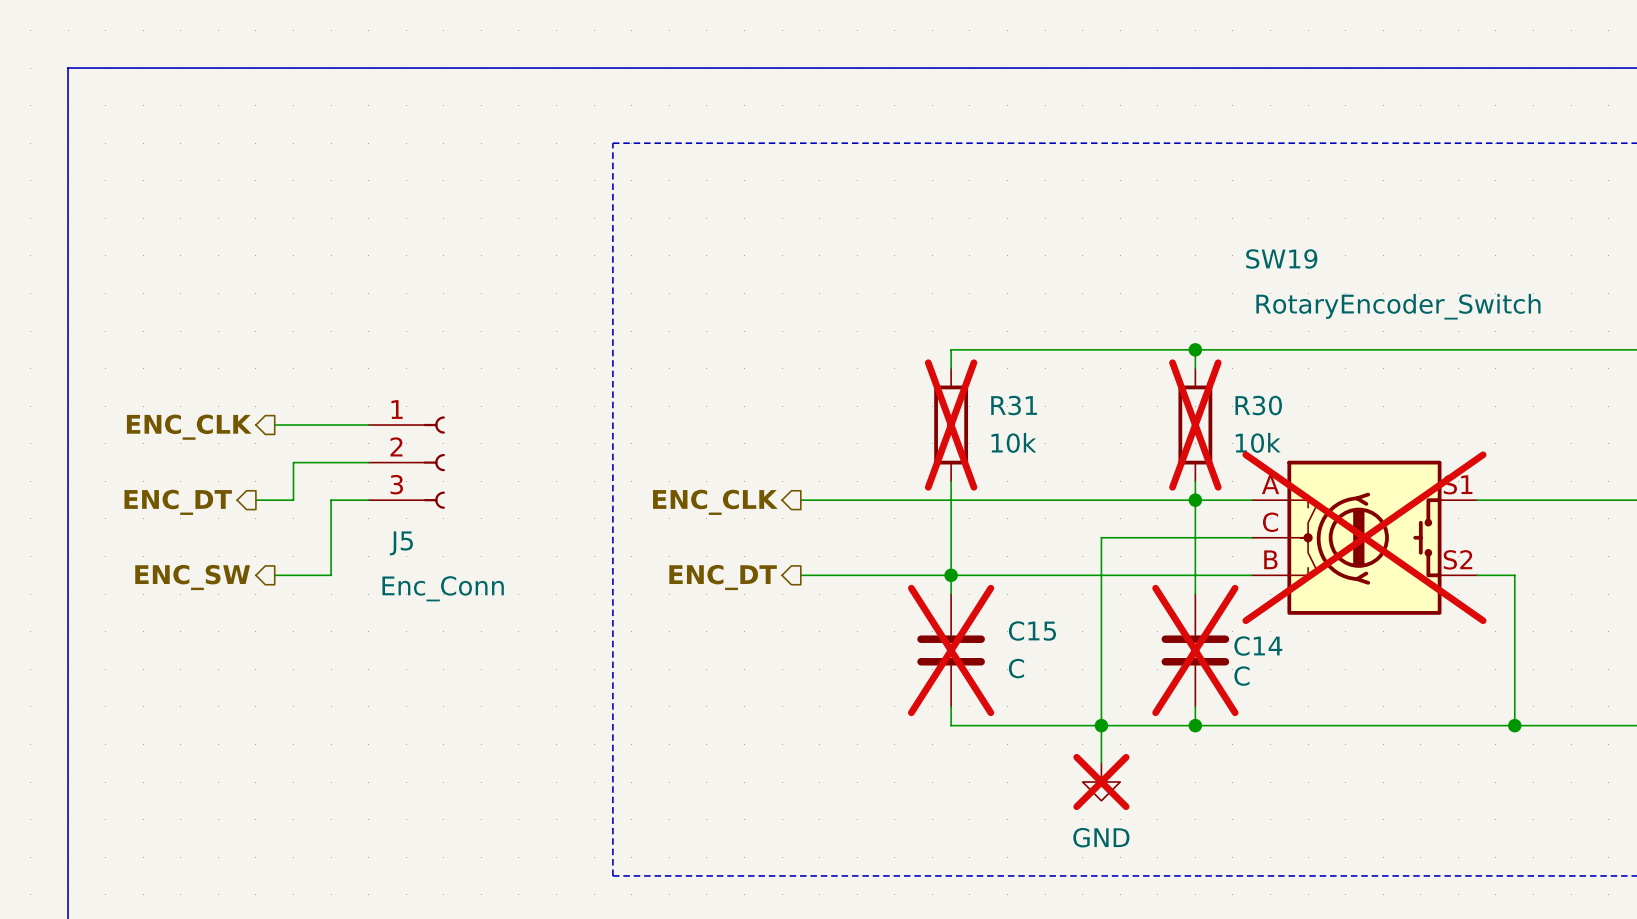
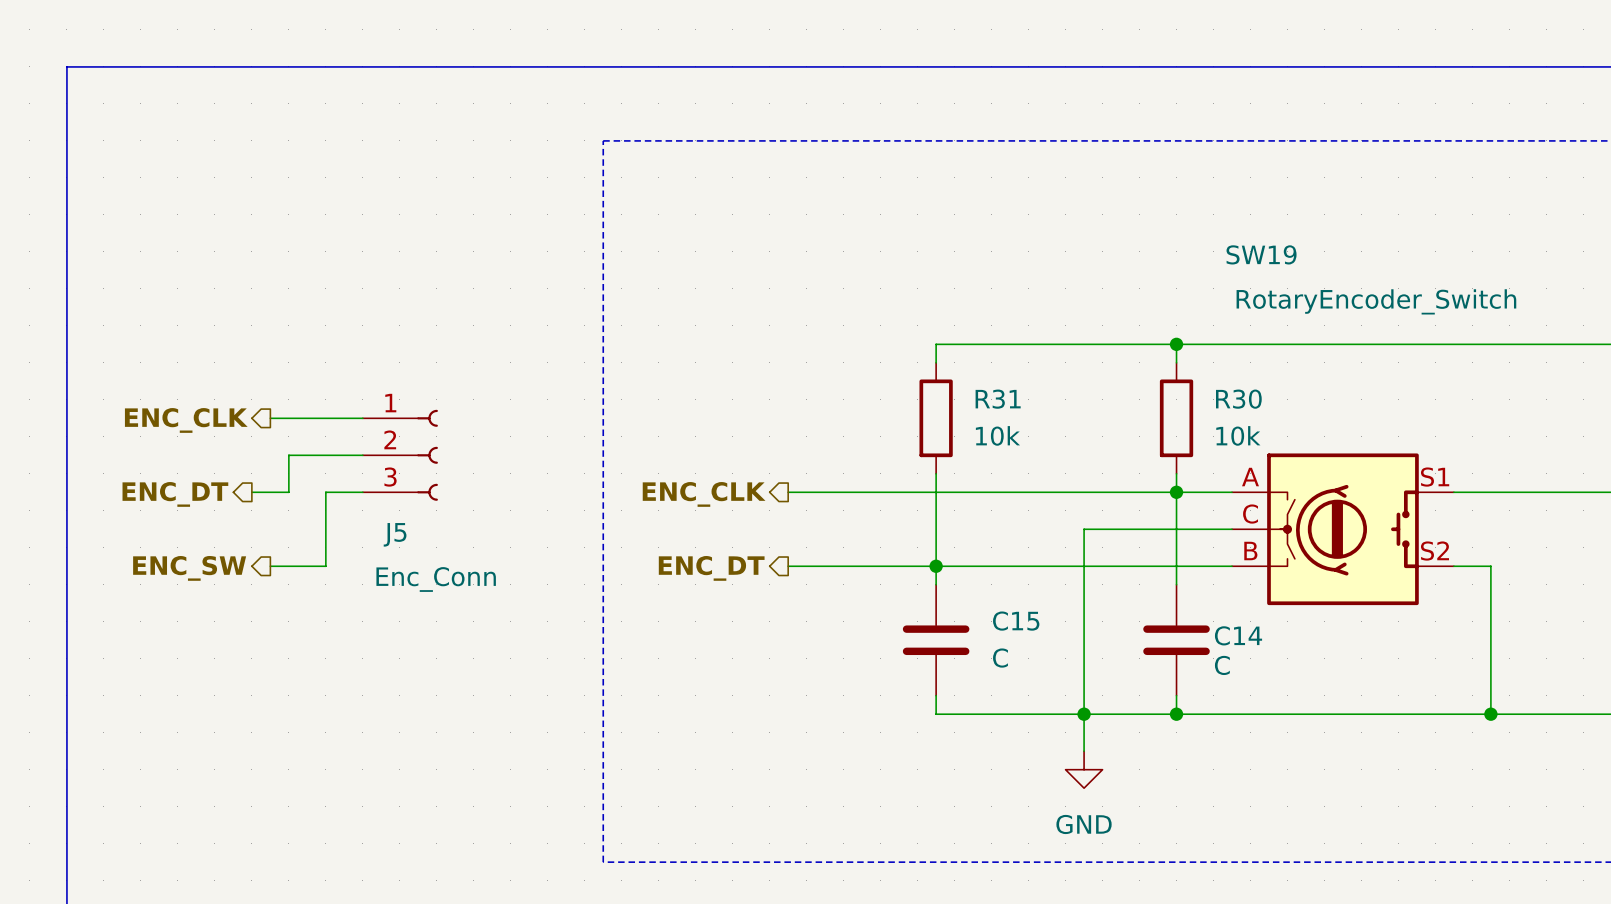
R31 do-not-place cross: (951, 425) -> none
R30 do-not-place cross: (1195, 425) -> none
SW19 do-not-place cross: (1364, 537) -> none
C15 do-not-place cross: (951, 650) -> none
C14 do-not-place cross: (1195, 650) -> none
power symbol do-not-place cross: (1101, 782) -> none

